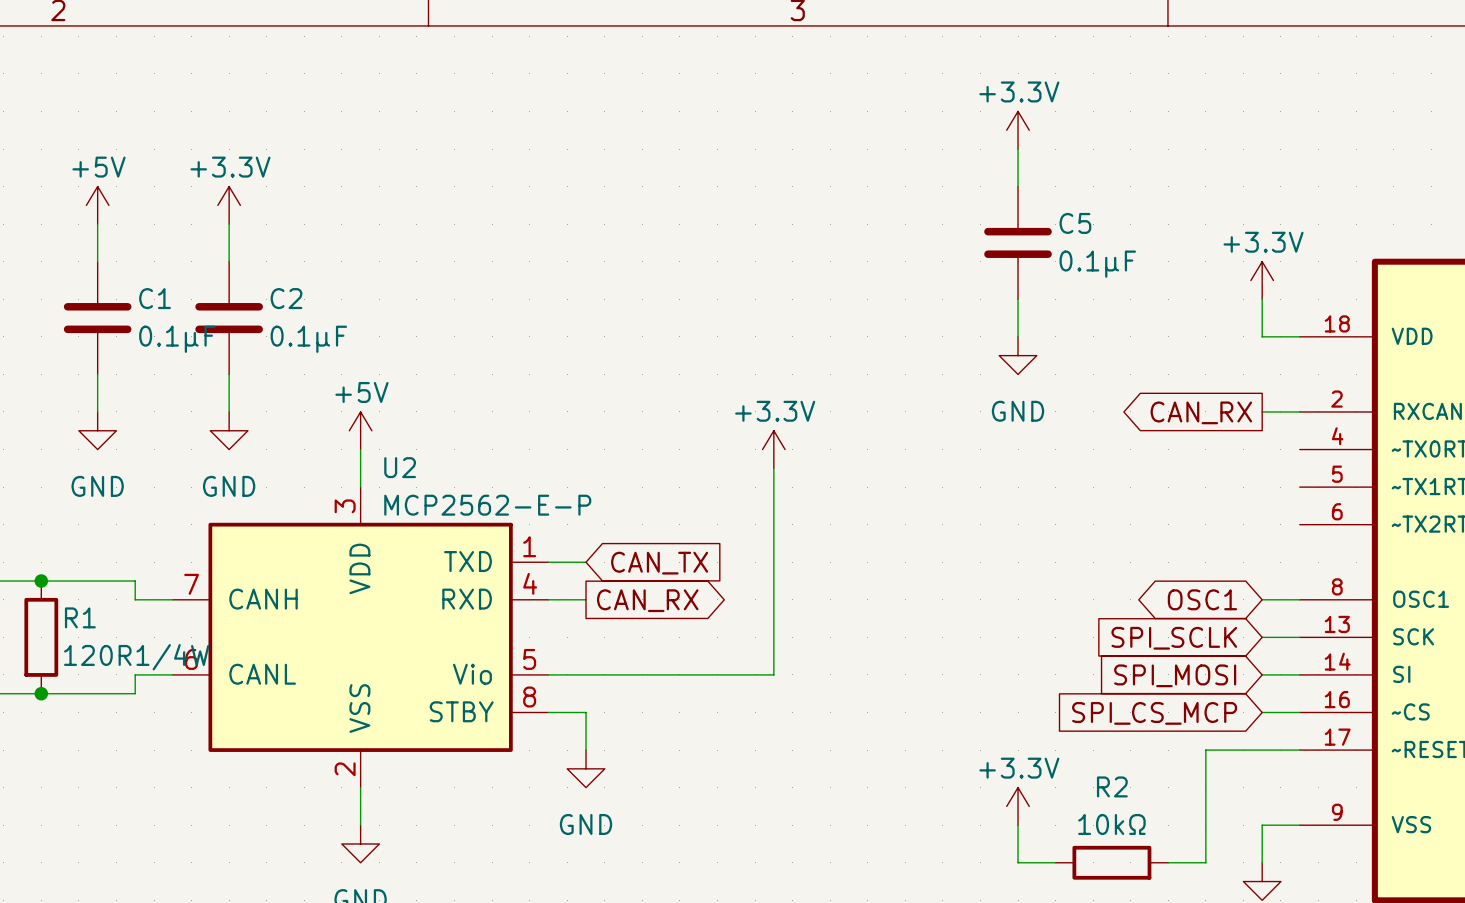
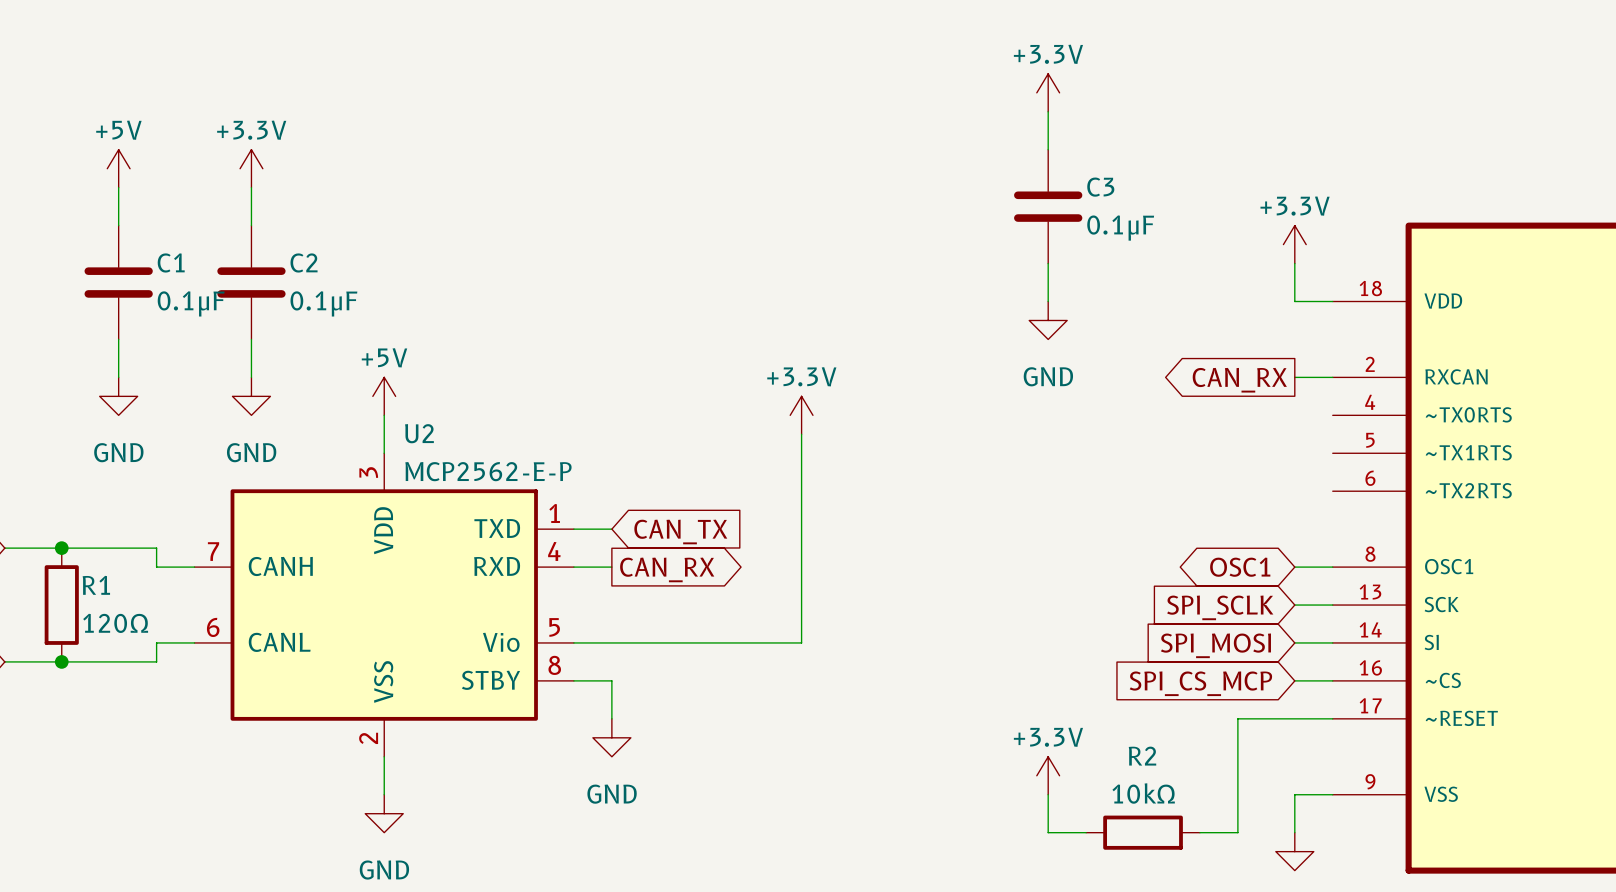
C5 name: C5 (1075, 223) -> C3 (1100, 187)
R1 value: 120R1/4W (136, 657) -> 120Ω (115, 623)

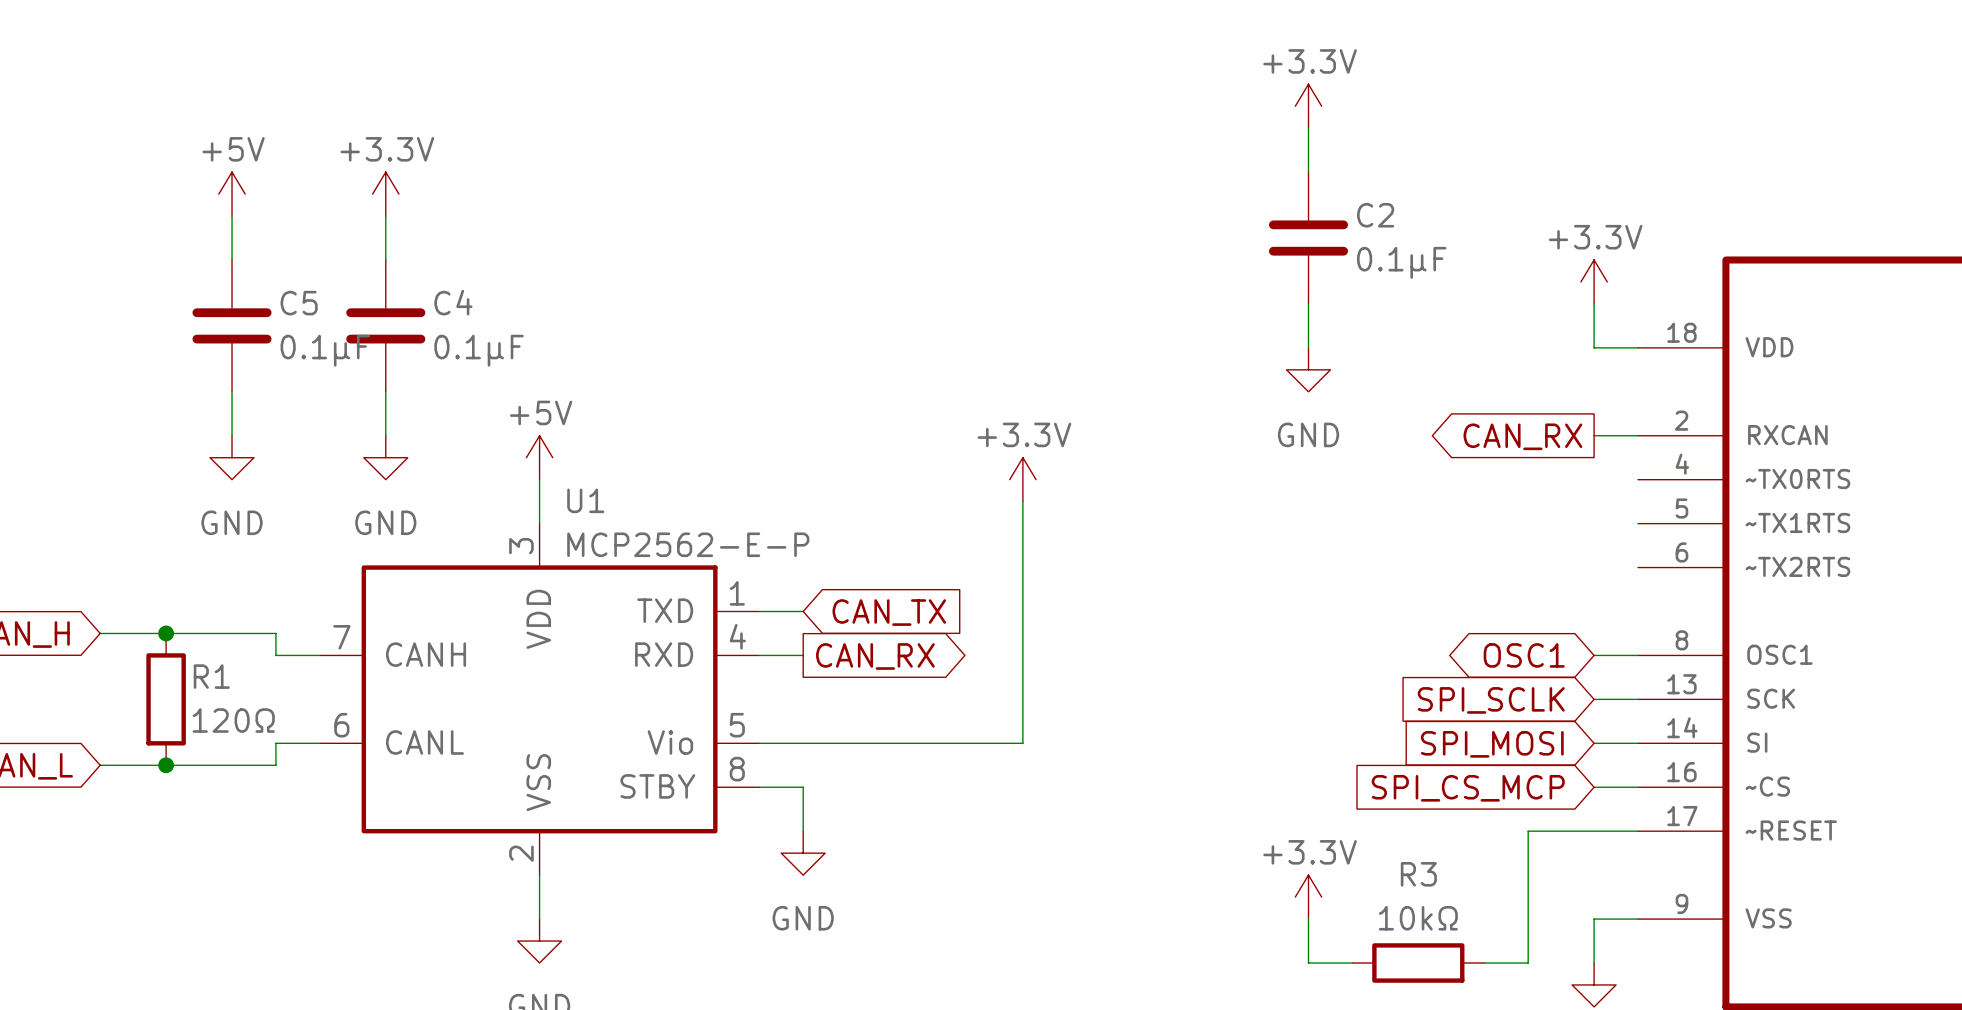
C3 name: C3 (1100, 187) -> C2 (1375, 215)
C1 name: C1 (171, 262) -> C5 (299, 303)
C2 name: C2 (304, 262) -> C4 (453, 302)
U2 name: U2 (419, 433) -> U1 (585, 500)
R2 name: R2 (1142, 756) -> R3 (1418, 874)

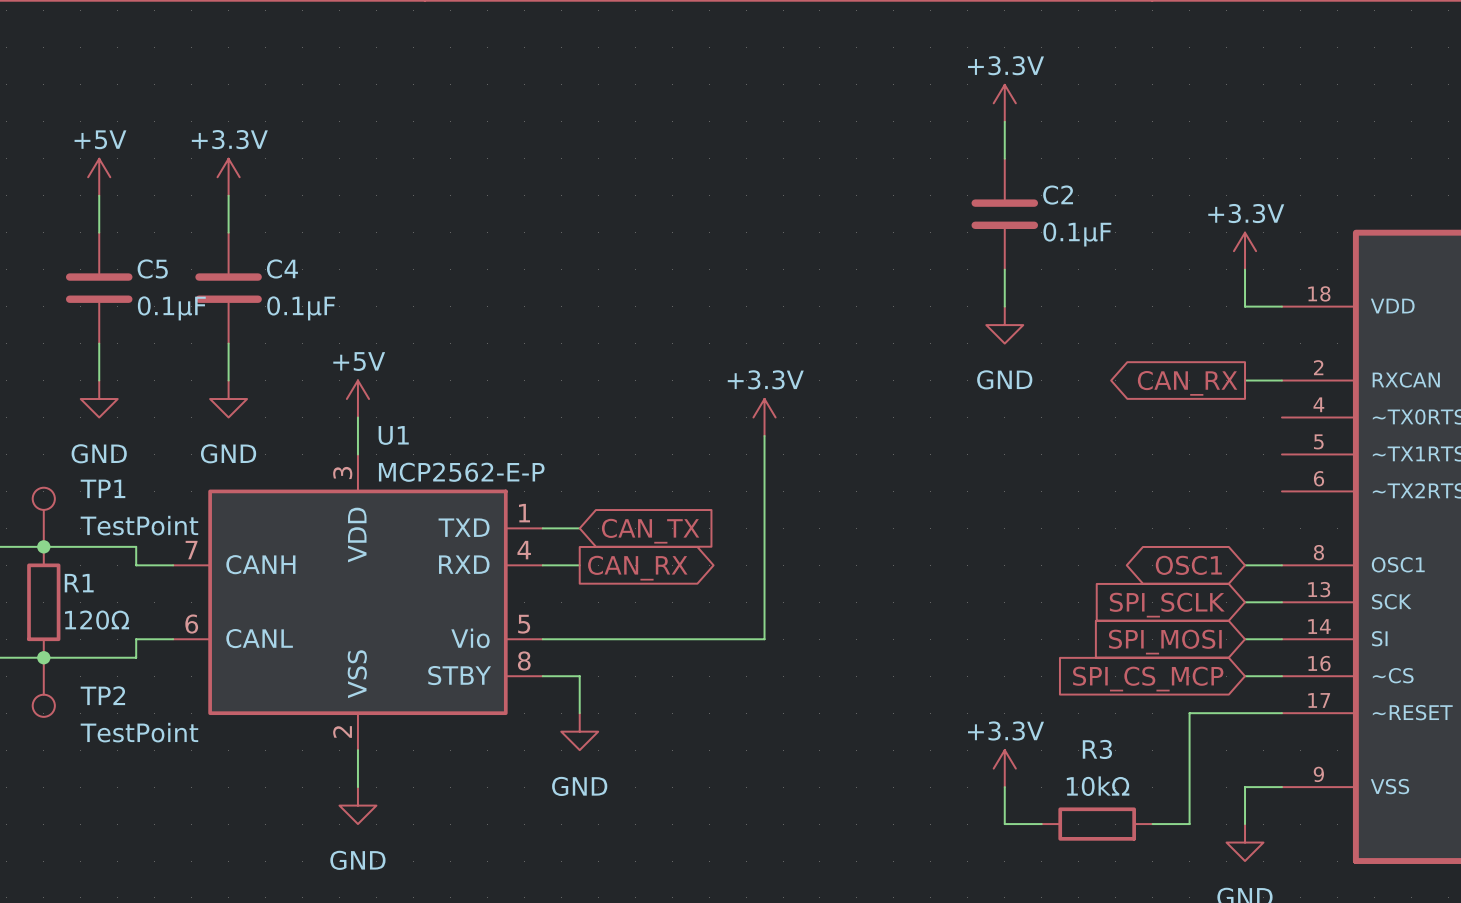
TP1: none -> TestPoint (43, 517)
TP2: none -> TestPoint (43, 687)

